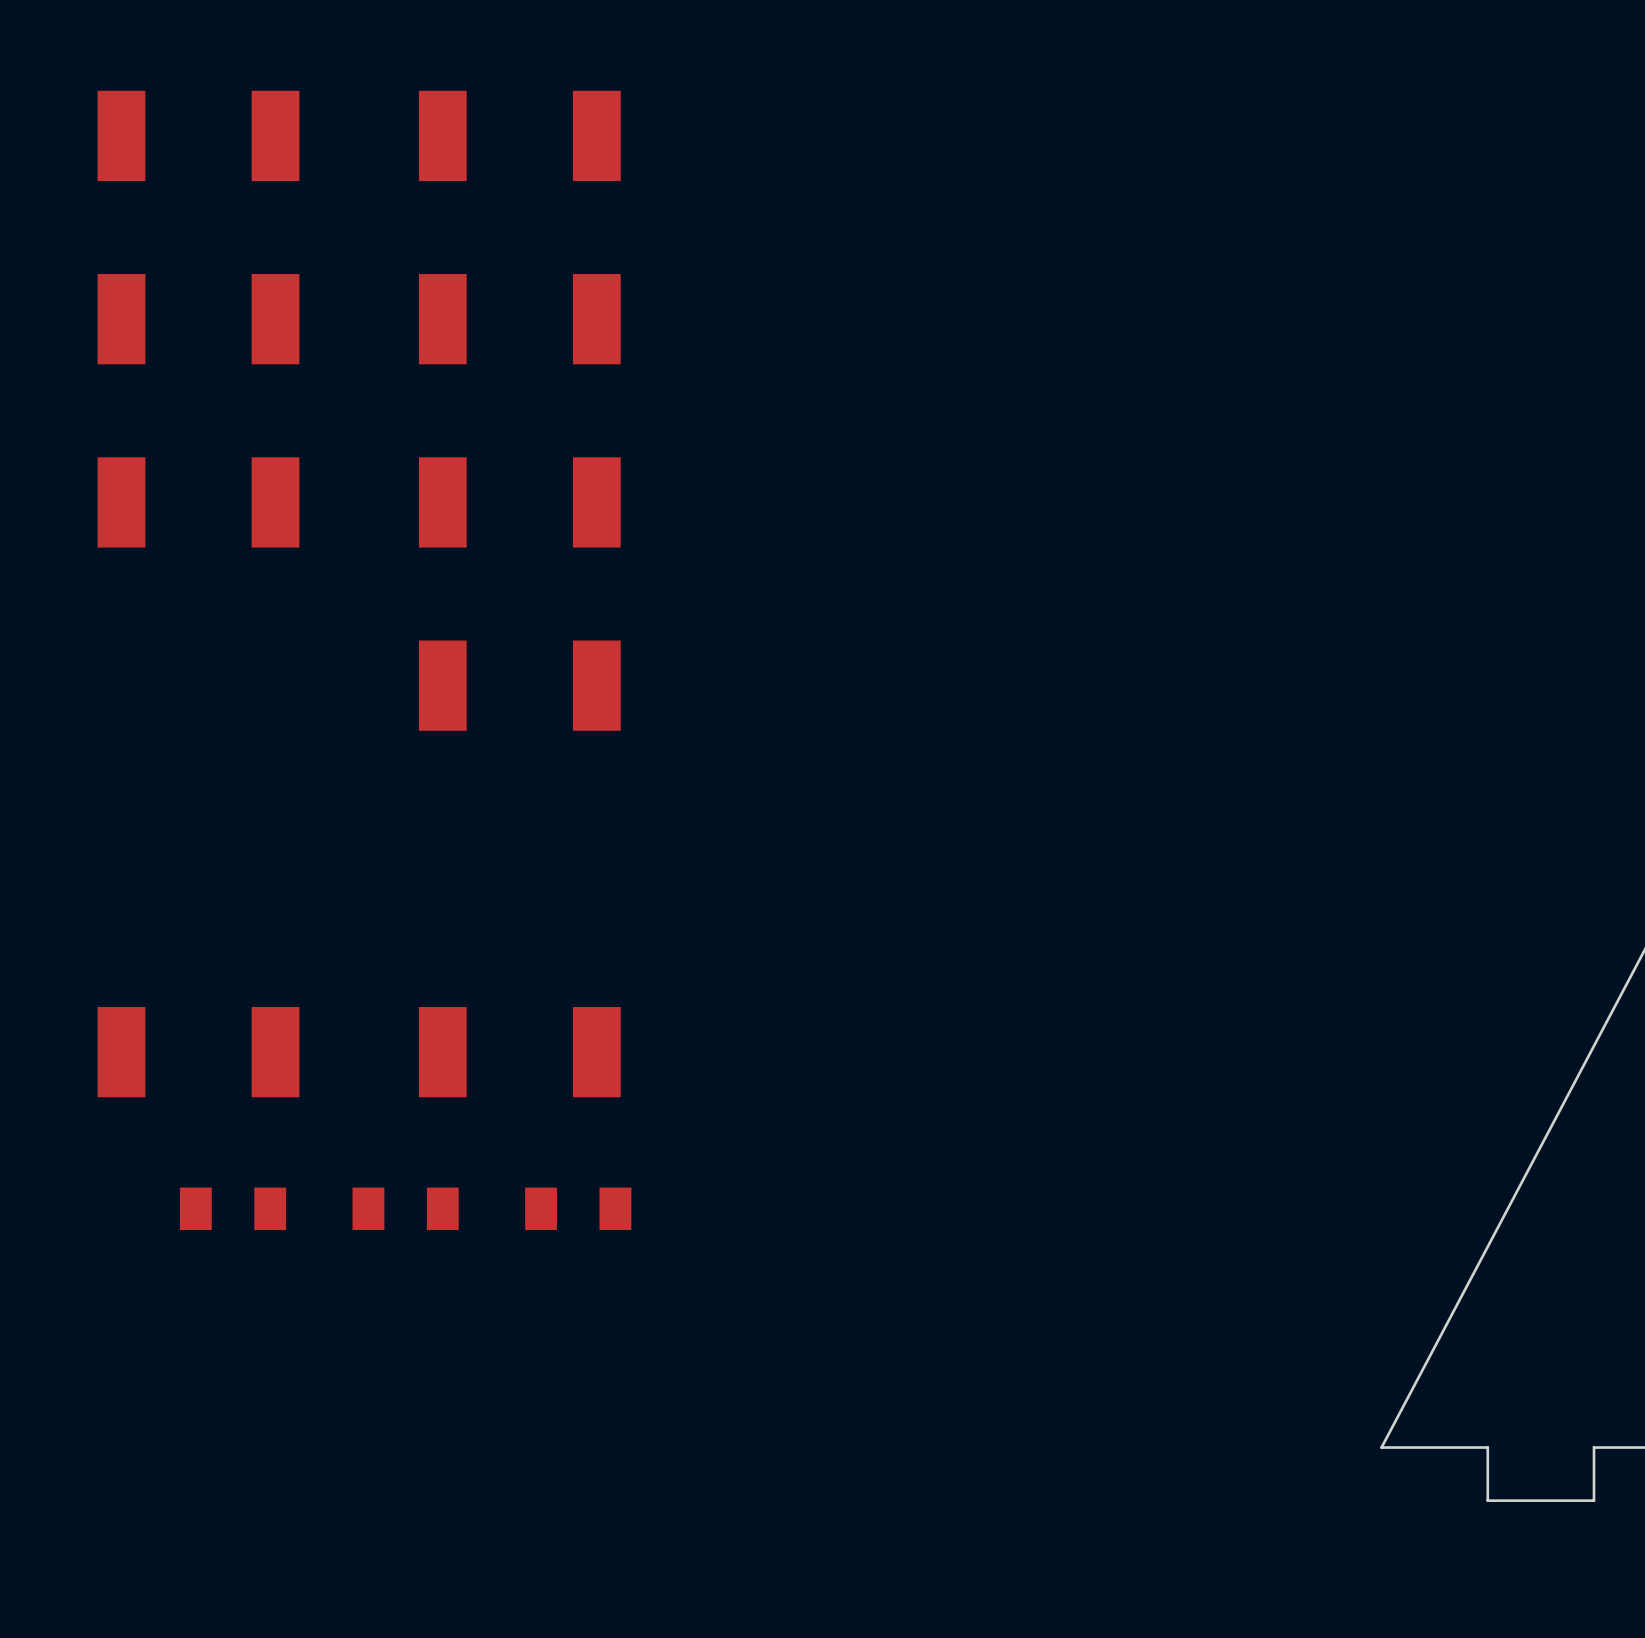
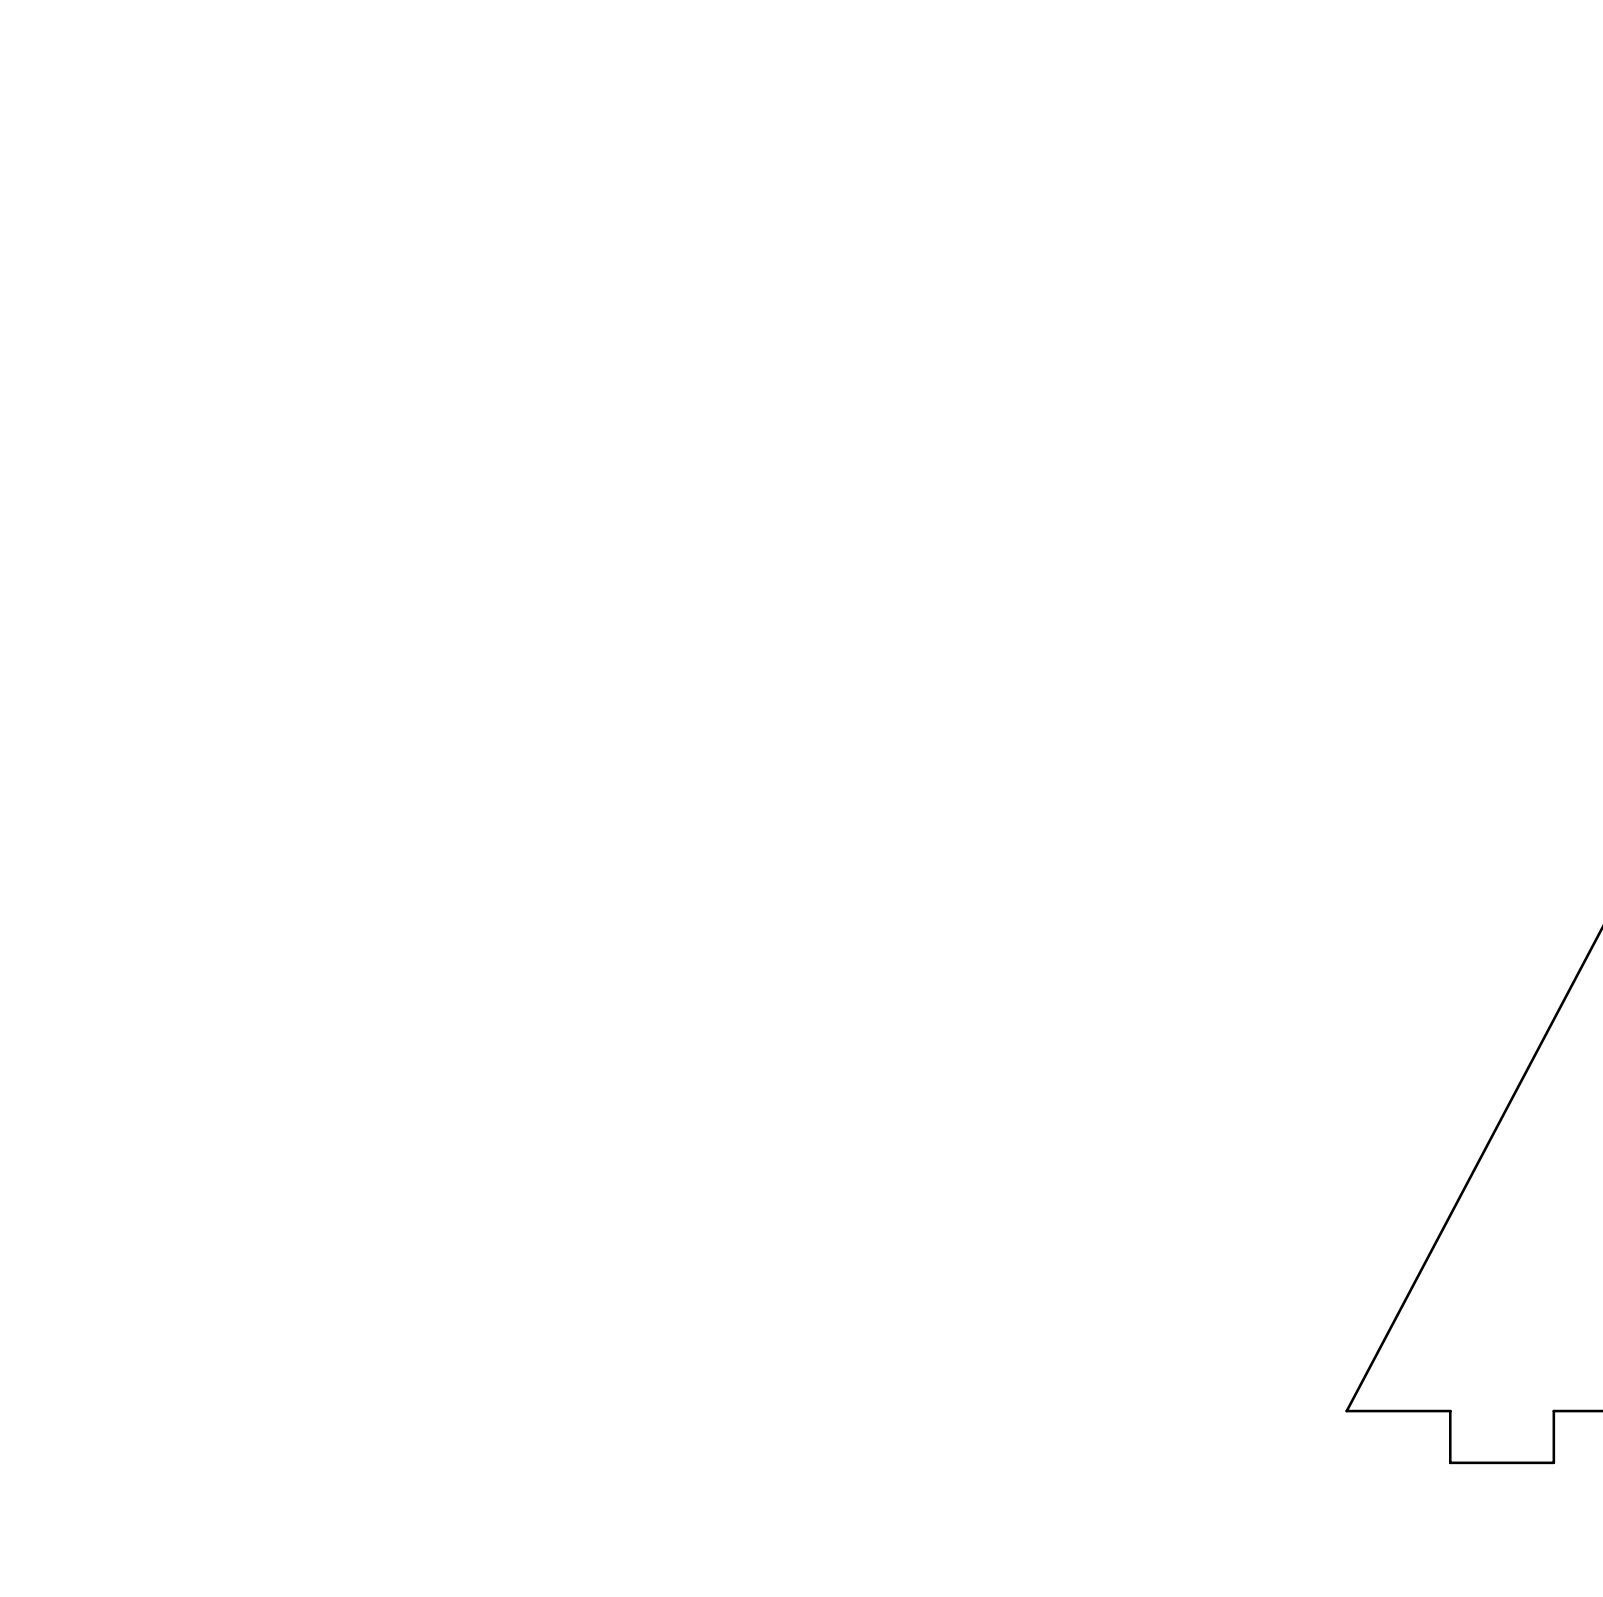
part: (198, 135) -> none
part: (519, 135) -> none
part: (198, 319) -> none
part: (519, 319) -> none
part: (198, 502) -> none
part: (519, 502) -> none
part: (519, 685) -> none
part: (198, 1052) -> none
part: (519, 1052) -> none
part: (233, 1208) -> none
part: (405, 1208) -> none
part: (578, 1208) -> none

